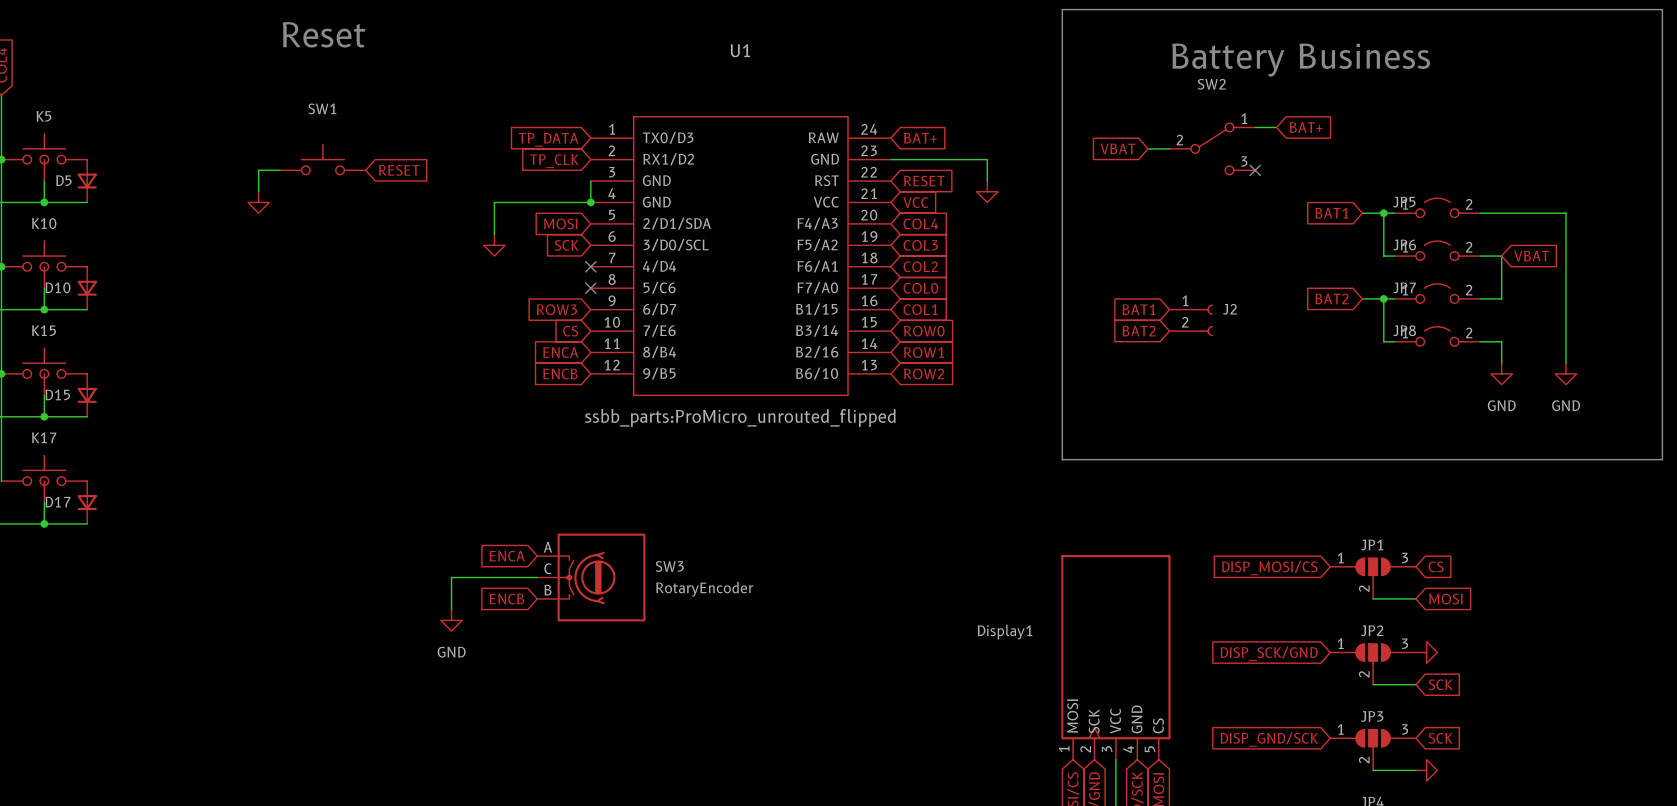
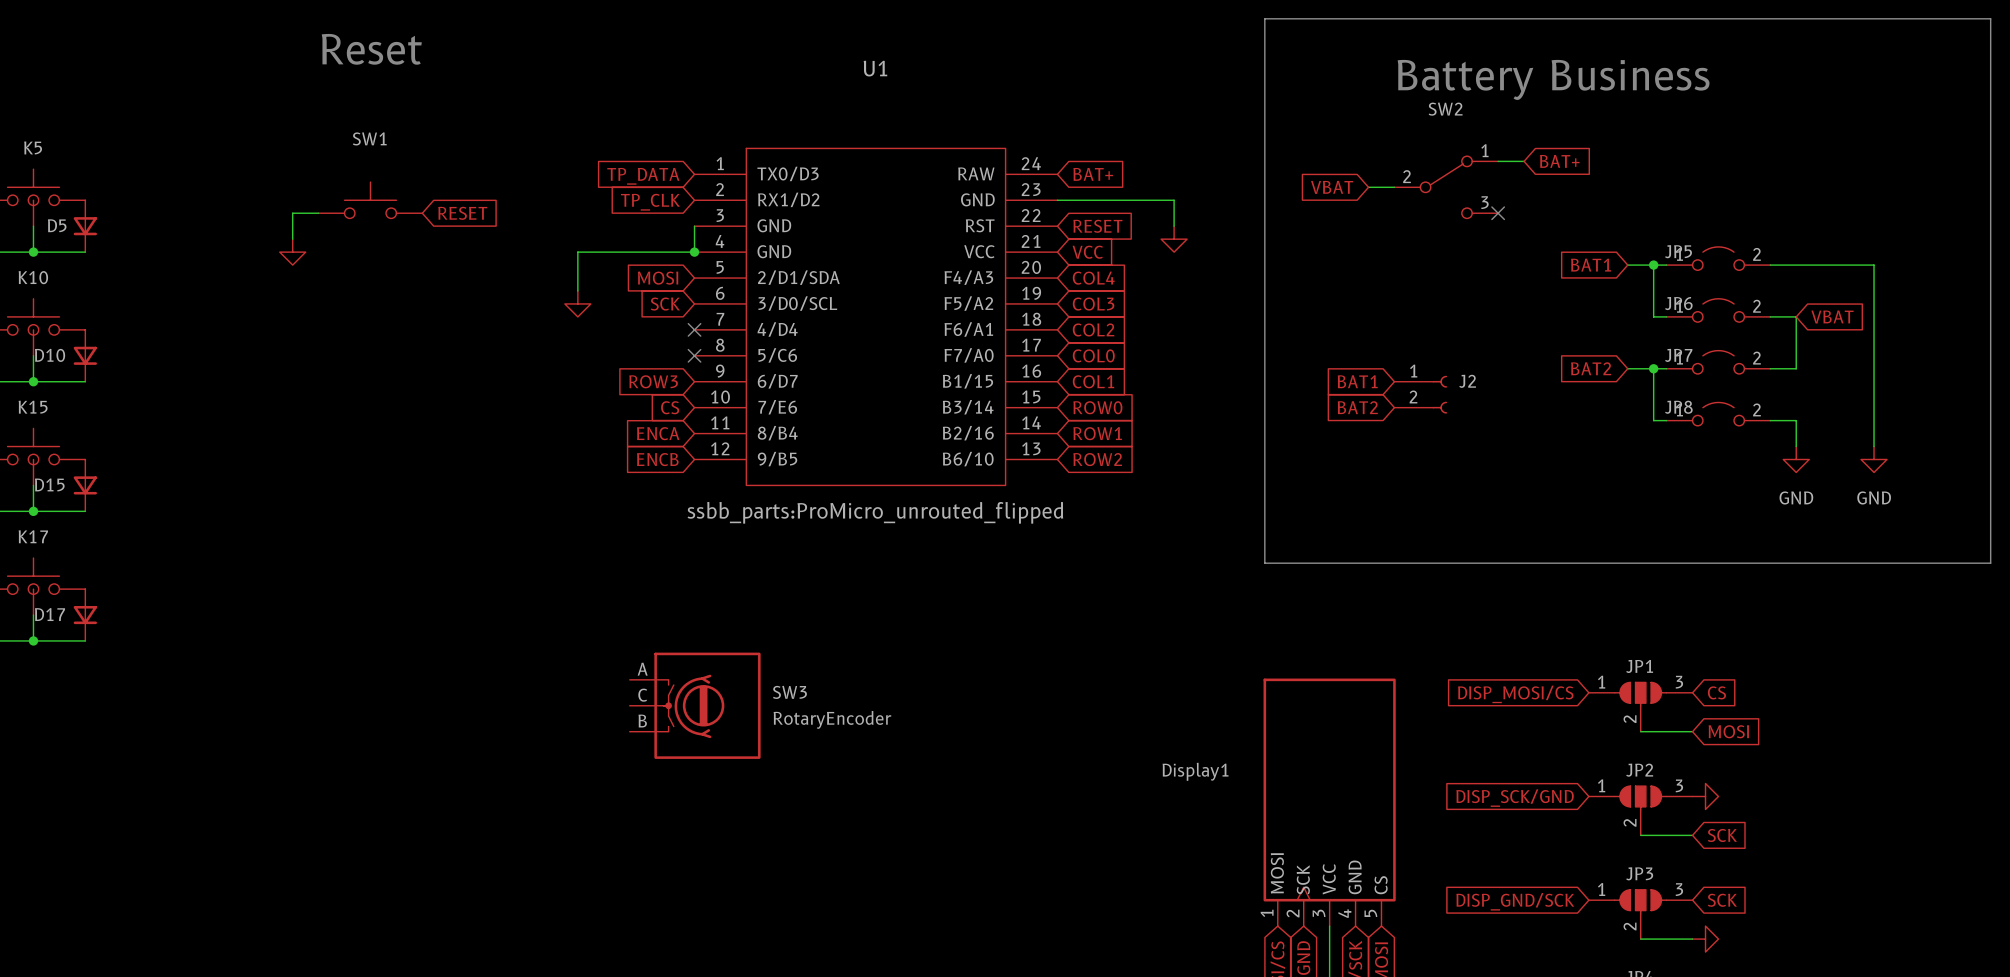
global label: ENCA (507, 556) -> none
wire: (537, 577) (451, 577) (451, 609) -> none
global label: ENCB (506, 599) -> none
power symbol: GND (451, 620) -> none

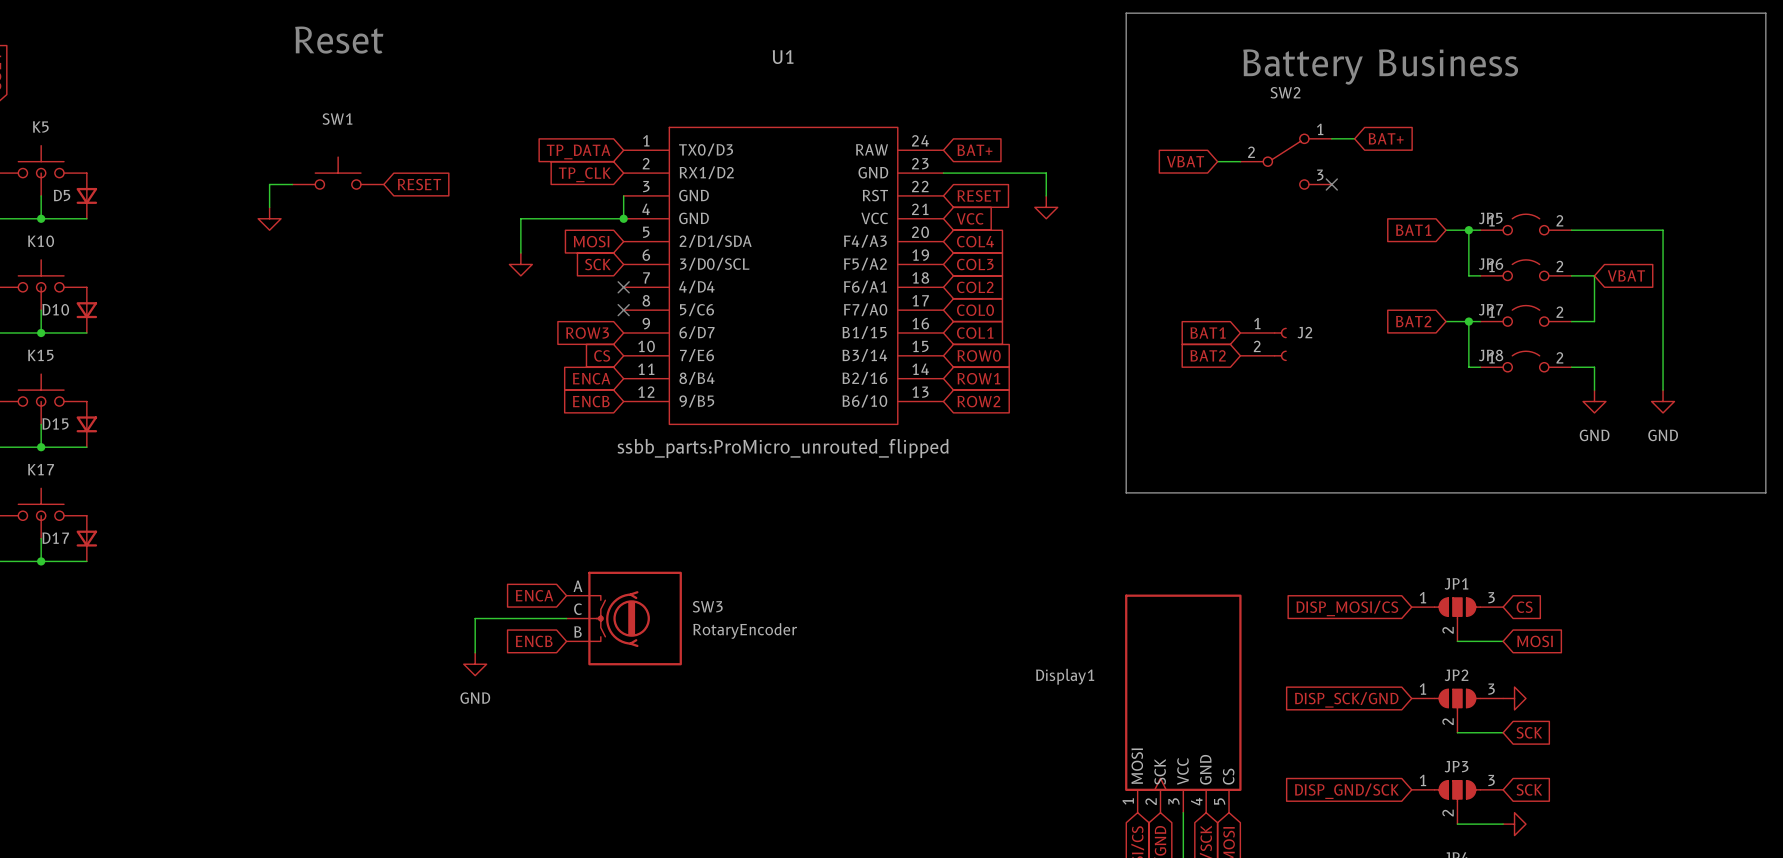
global label: none -> ENCA (534, 595)
wire: none -> (566, 618) (475, 618) (475, 652)
global label: none -> ENCB (534, 641)
power symbol: none -> GND (475, 664)

